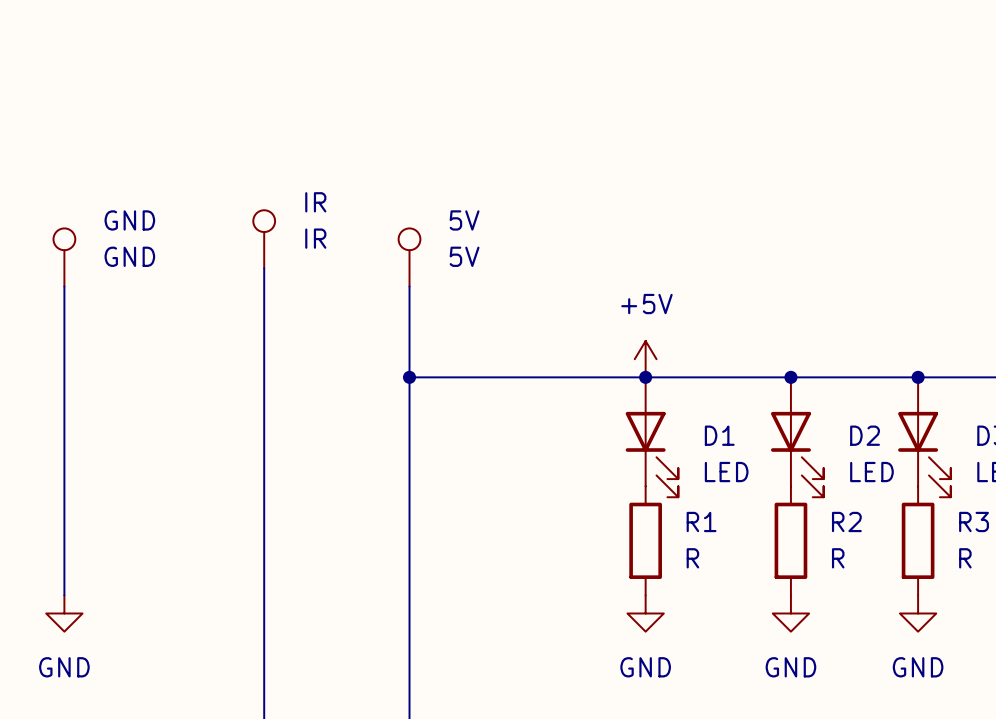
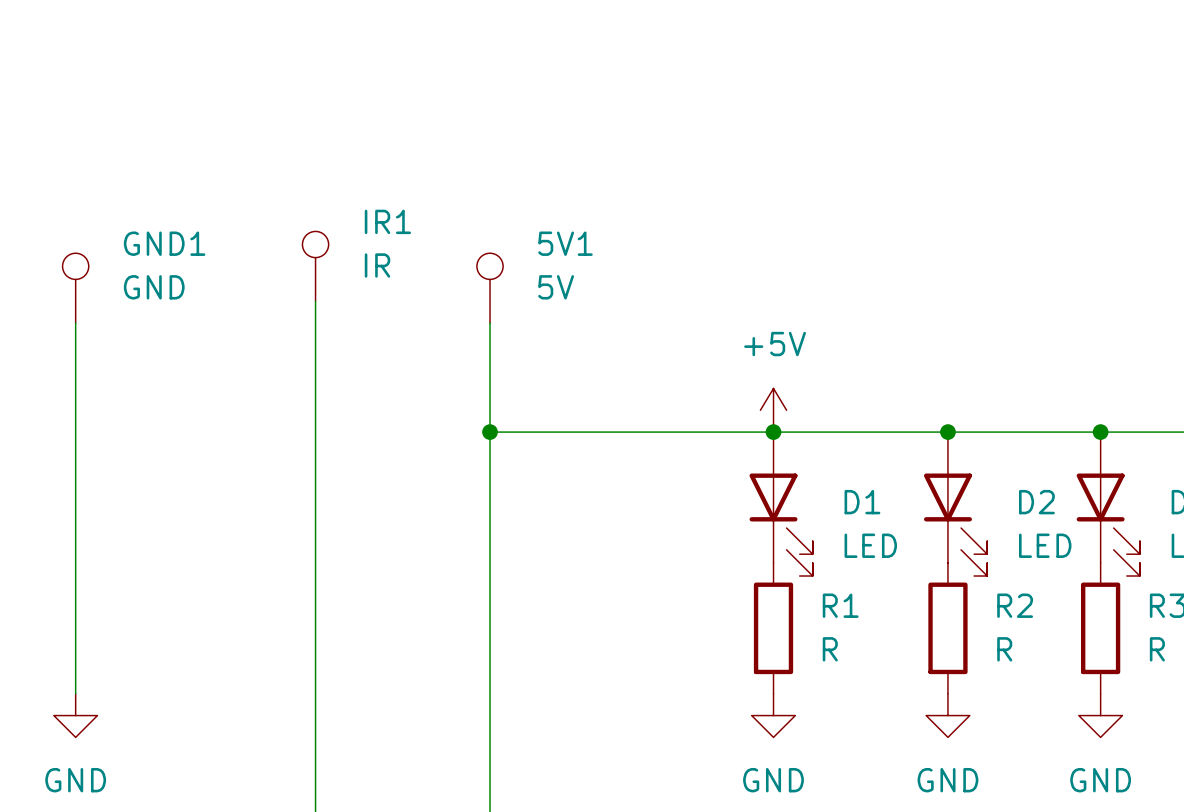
IR name: IR (315, 202) -> IR1 (387, 221)
GND name: GND (129, 220) -> GND1 (164, 243)
5V name: 5V (464, 220) -> 5V1 (565, 243)

